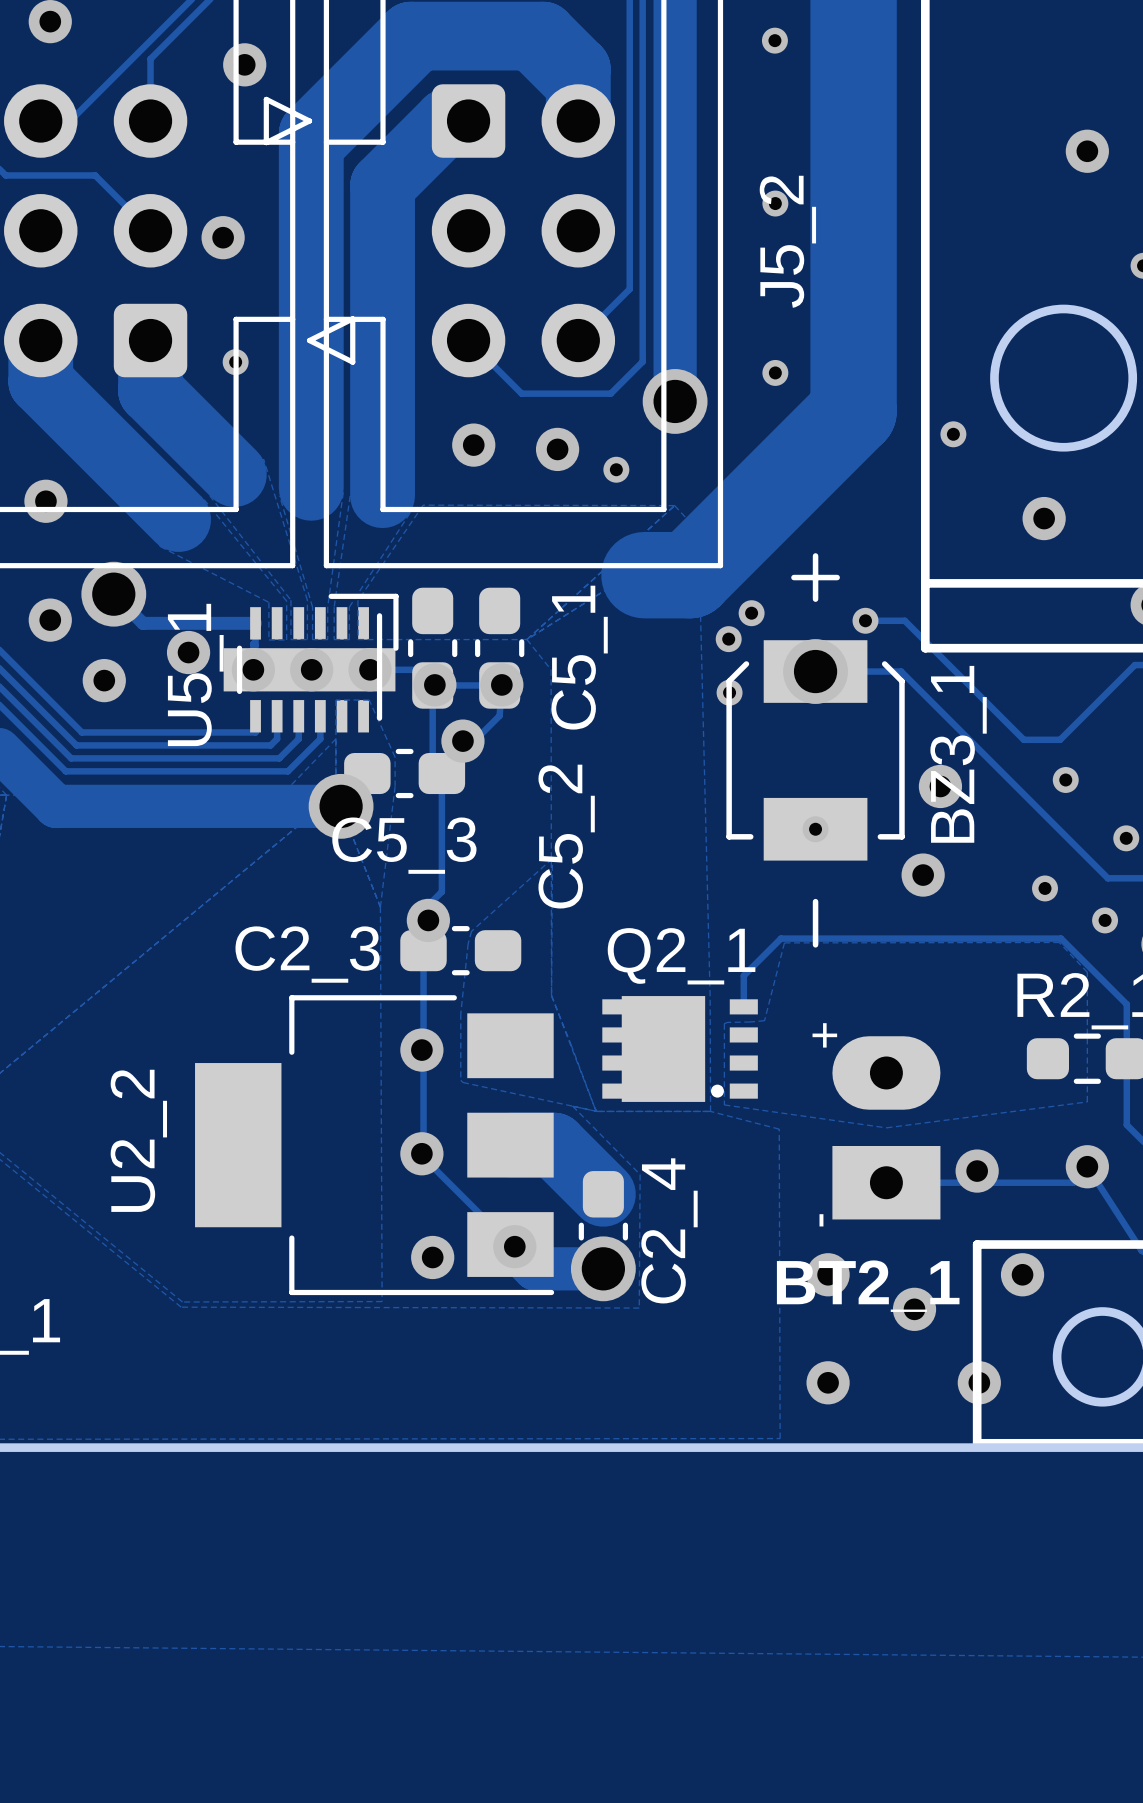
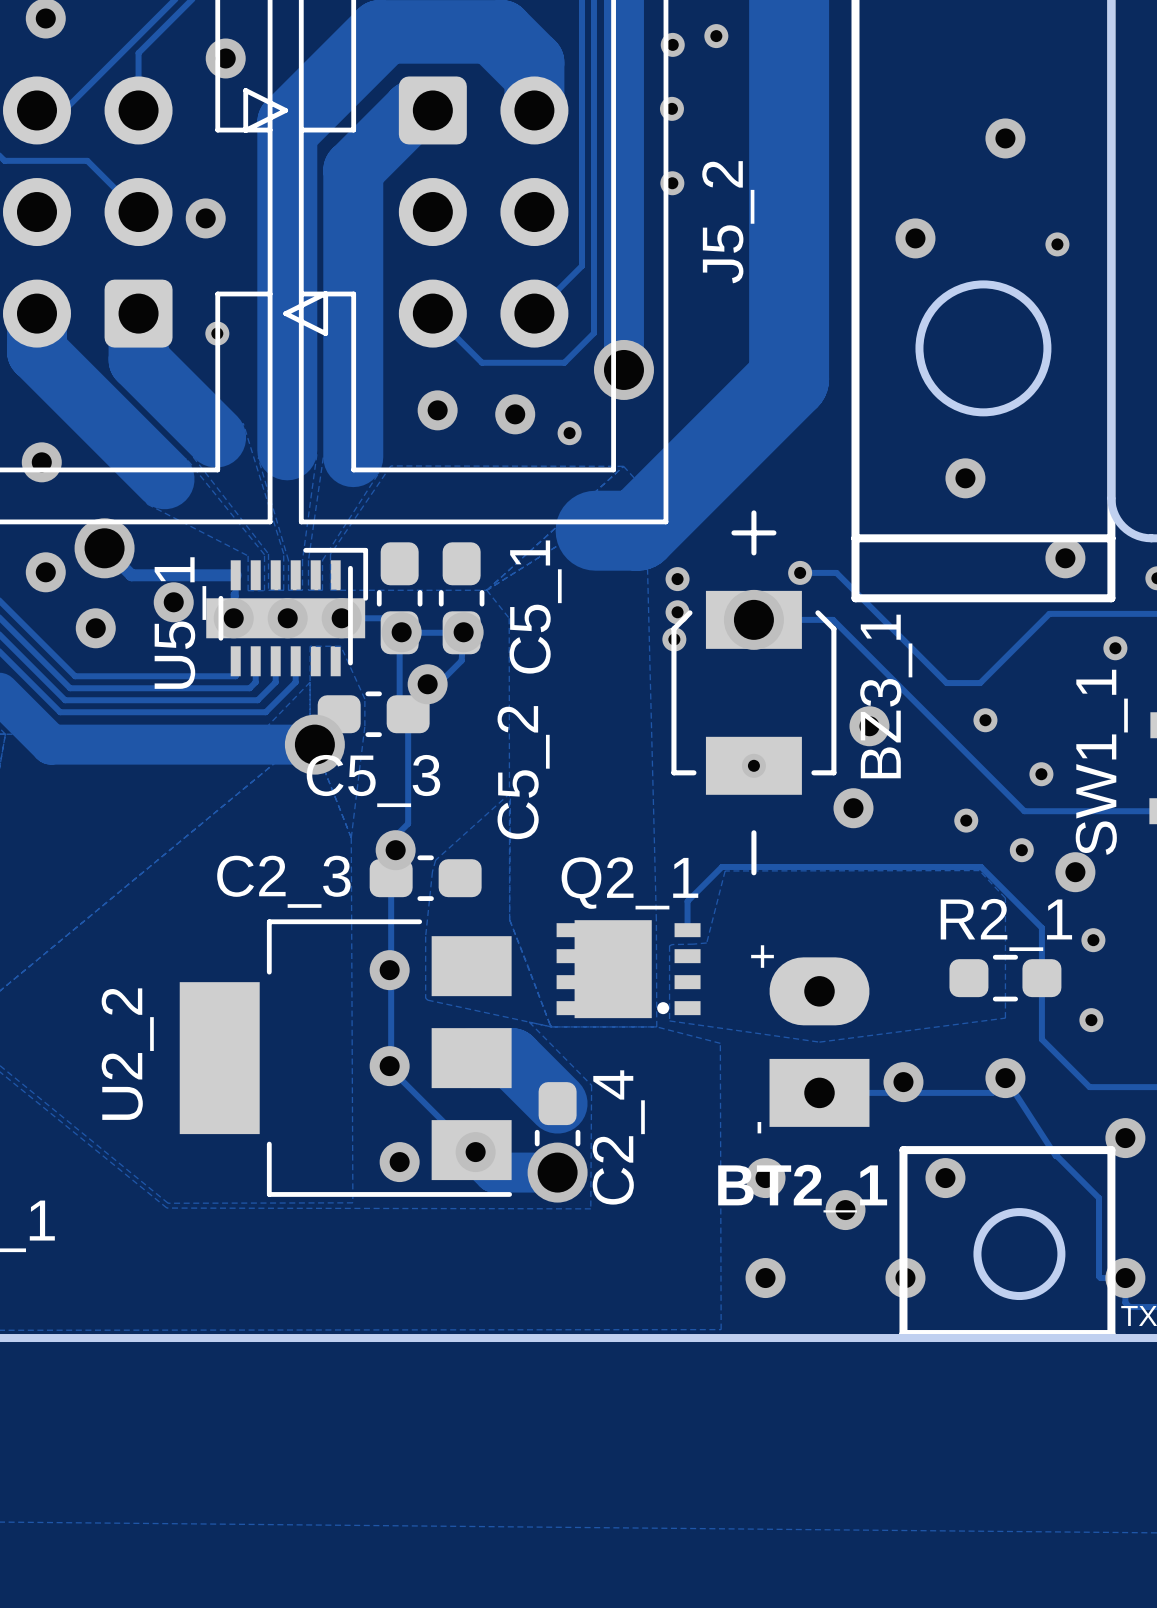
via: none -> (672, 44)
via: none -> (671, 108)
via position: (775, 203) -> (672, 183)
via: none -> (915, 238)
via: (775, 372) -> none
via: (953, 434) -> none
via: (751, 613) -> none
via: none -> (677, 579)
via: (728, 639) -> none
via: none -> (677, 612)

